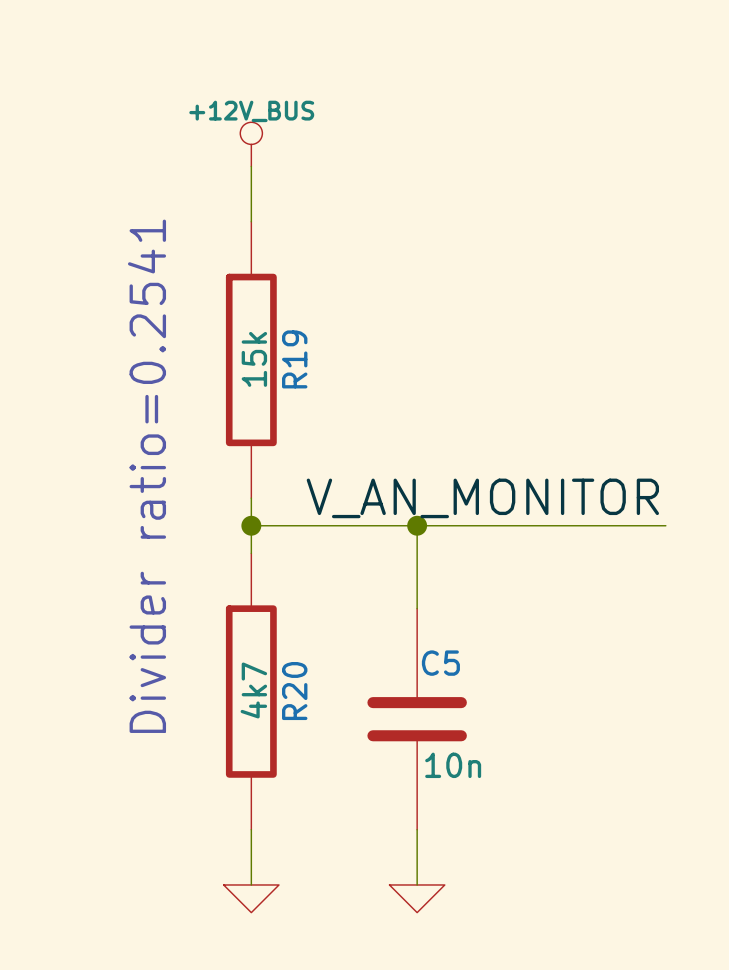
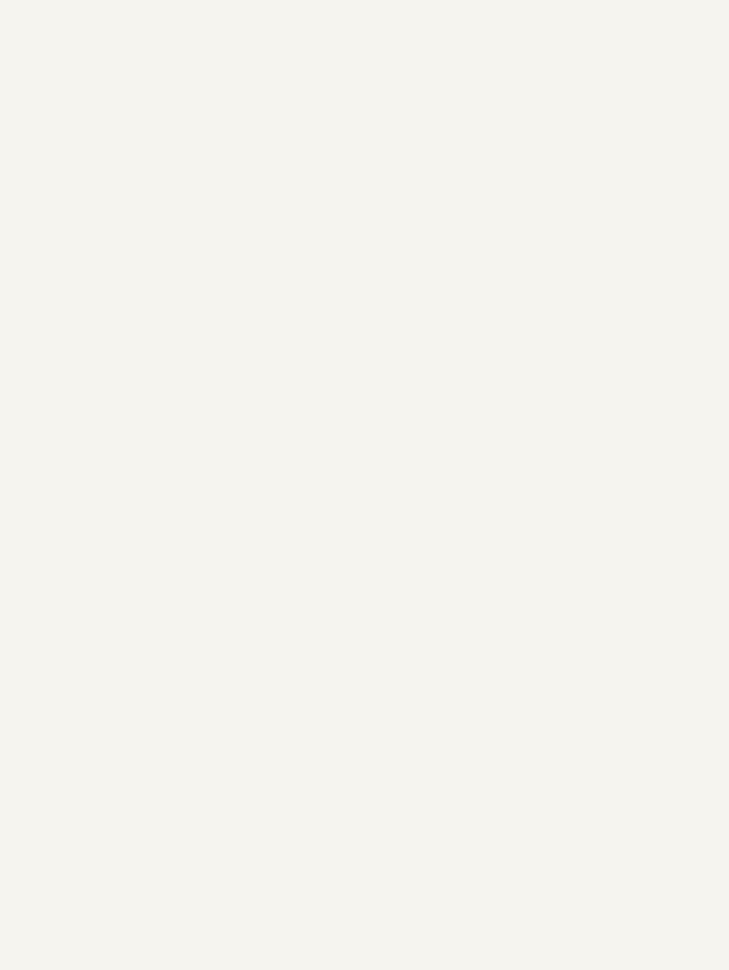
power symbol: +12V_BUS (251, 144) -> none
wire: (251, 166) (251, 221) -> none
R19: 15k (251, 359) -> none
text: Divider ratio=0.2541 (147, 476) -> none
wire: (251, 498) (251, 553) -> none
label: V_AN_MONITOR (482, 498) -> none
wire: (251, 525) (665, 525) -> none
junction: (251, 525) -> none
wire: (417, 525) (417, 608) -> none
junction: (417, 525) -> none
R20: 4k7 (251, 691) -> none
C5: 10n (417, 719) -> none
wire: (251, 829) (251, 884) -> none
wire: (417, 829) (417, 884) -> none
power symbol: (251, 898) -> none
power symbol: (417, 898) -> none

